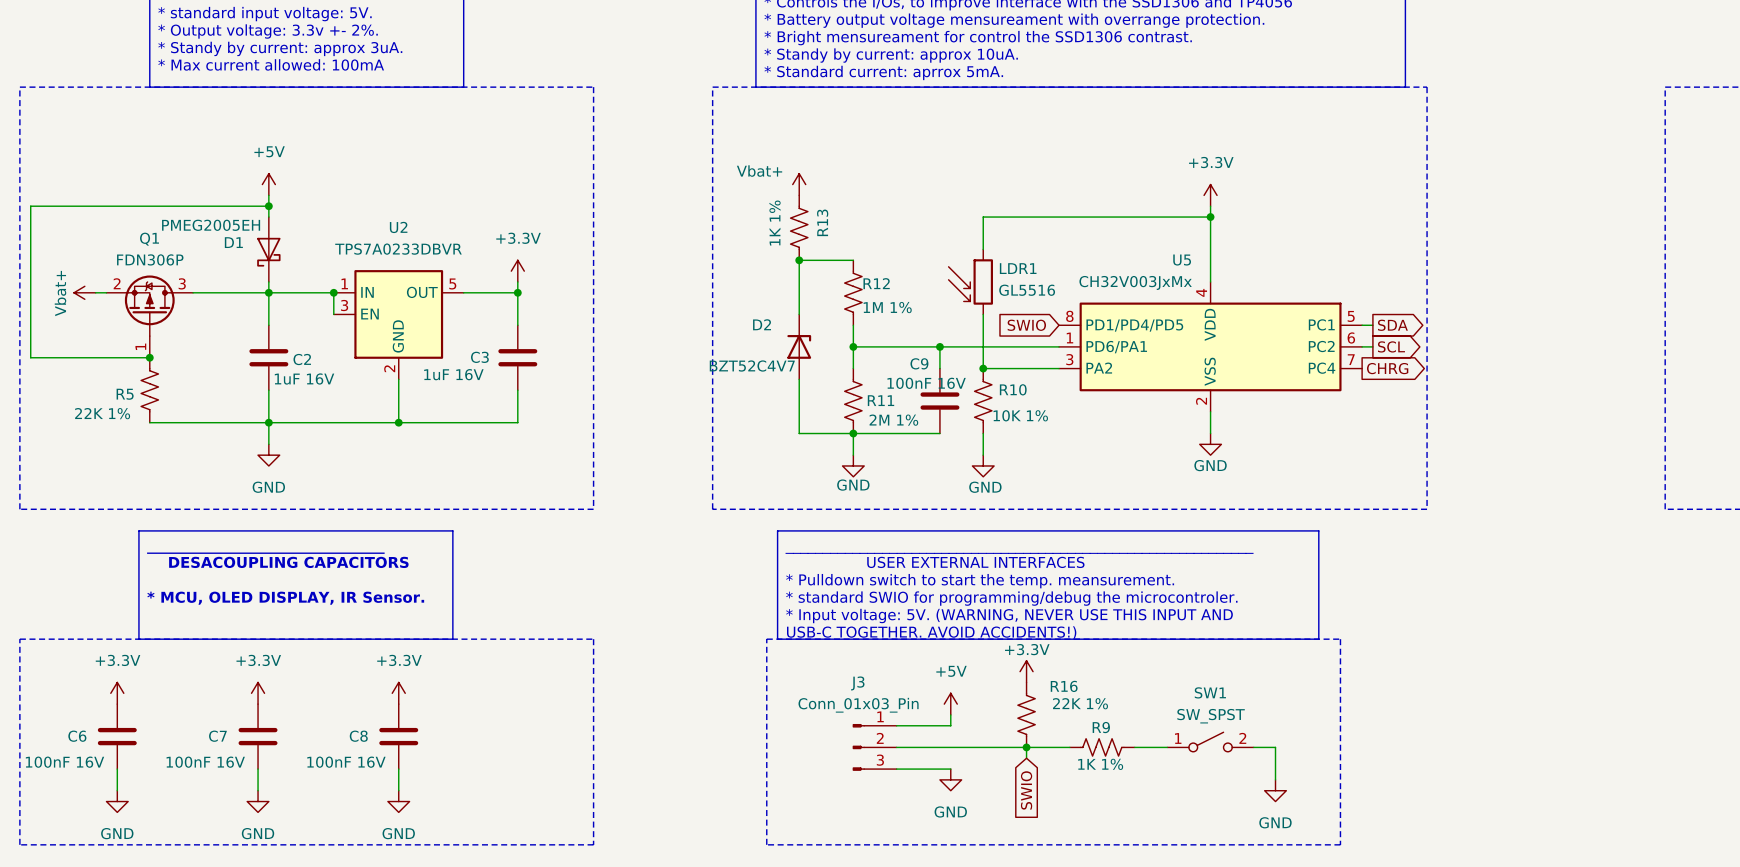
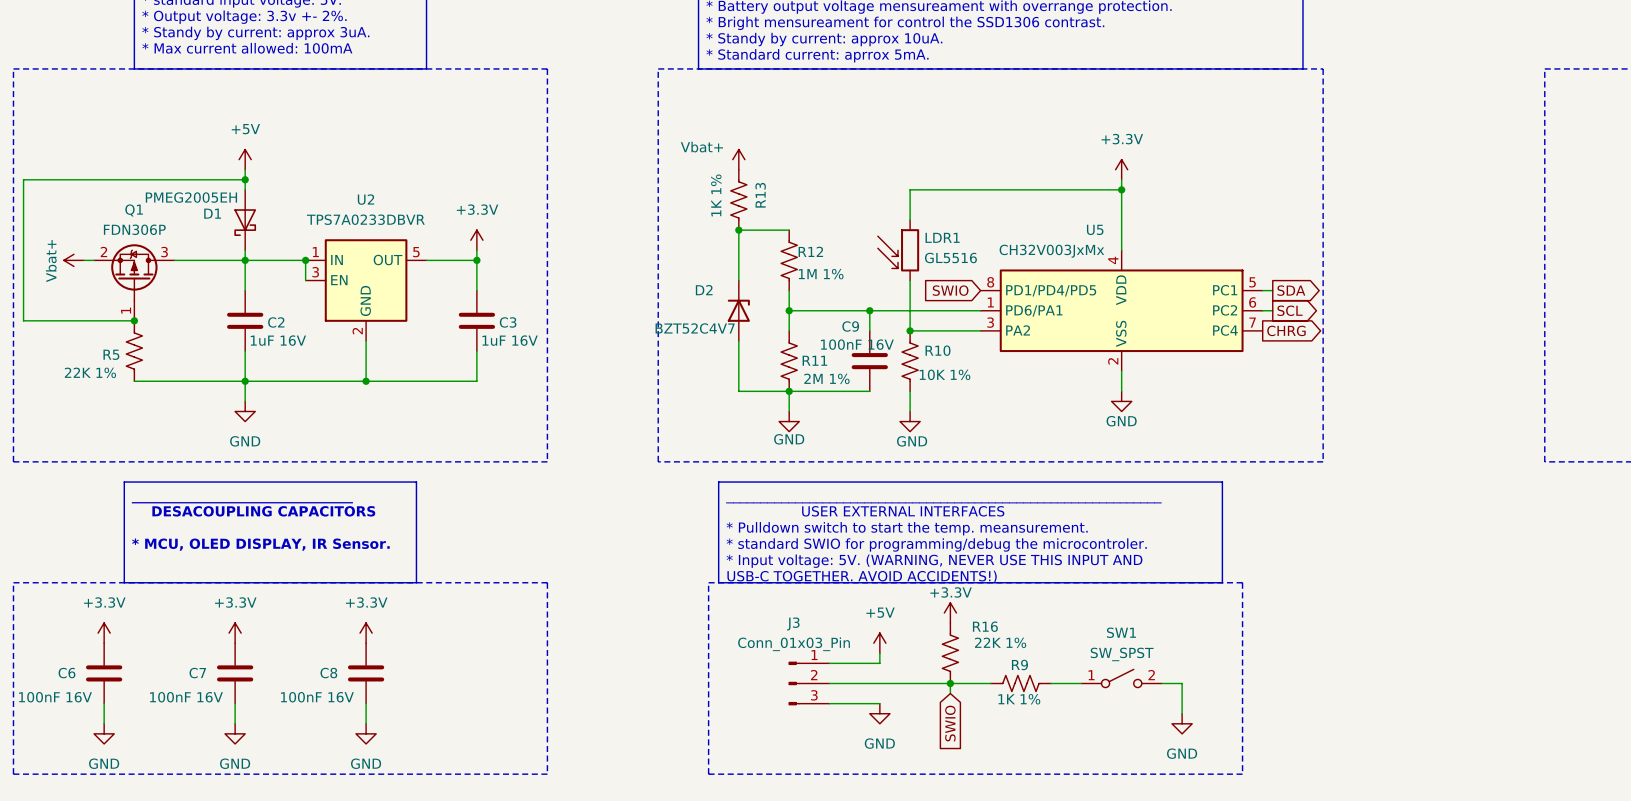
C3 name position: C3 (479, 357) -> C3 (508, 322)
C3 value position: 1uF 16V (453, 374) -> 1uF 16V (510, 340)

